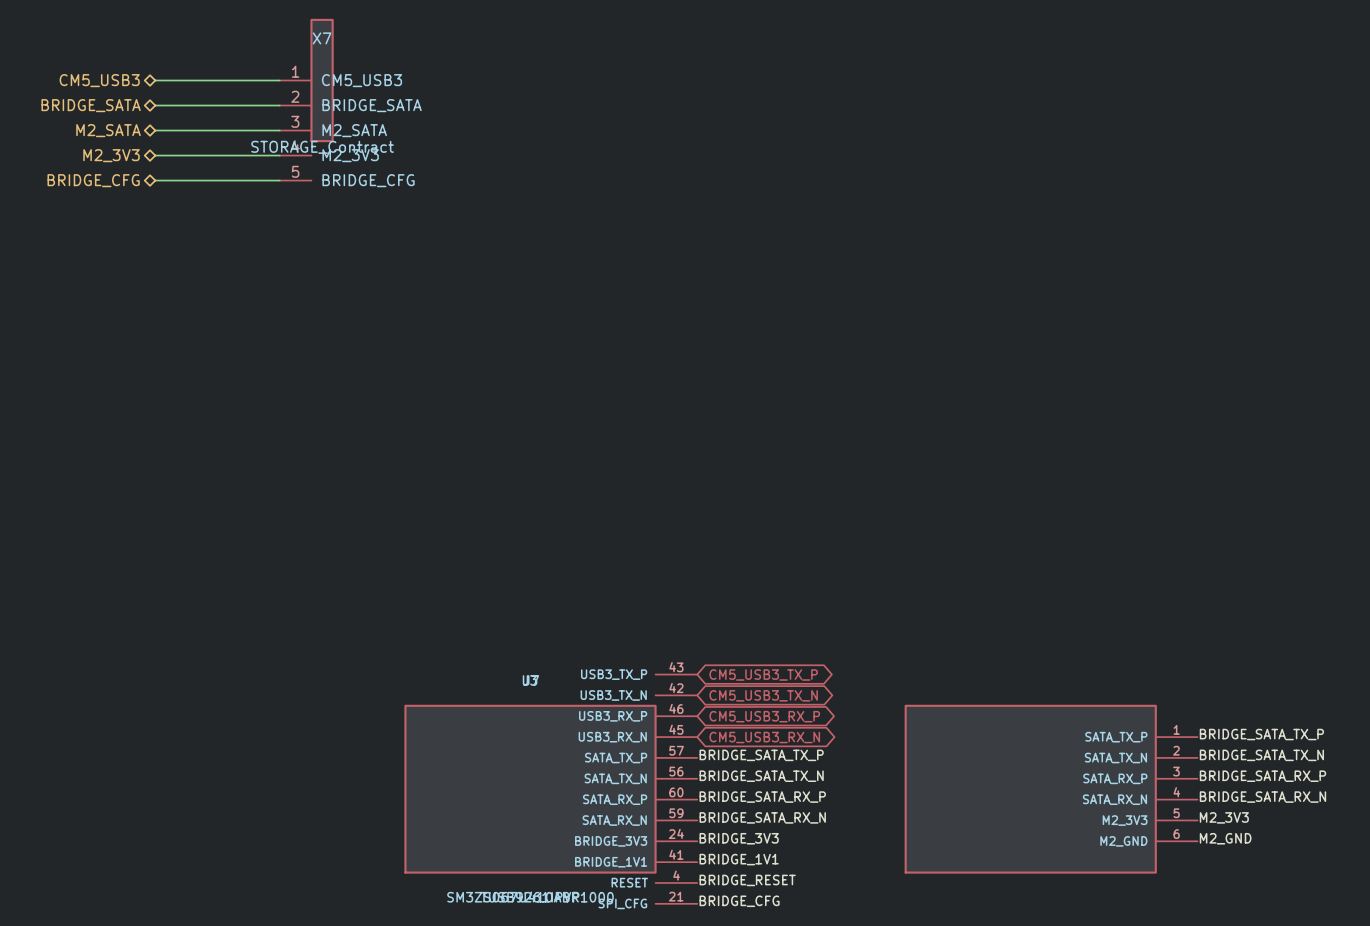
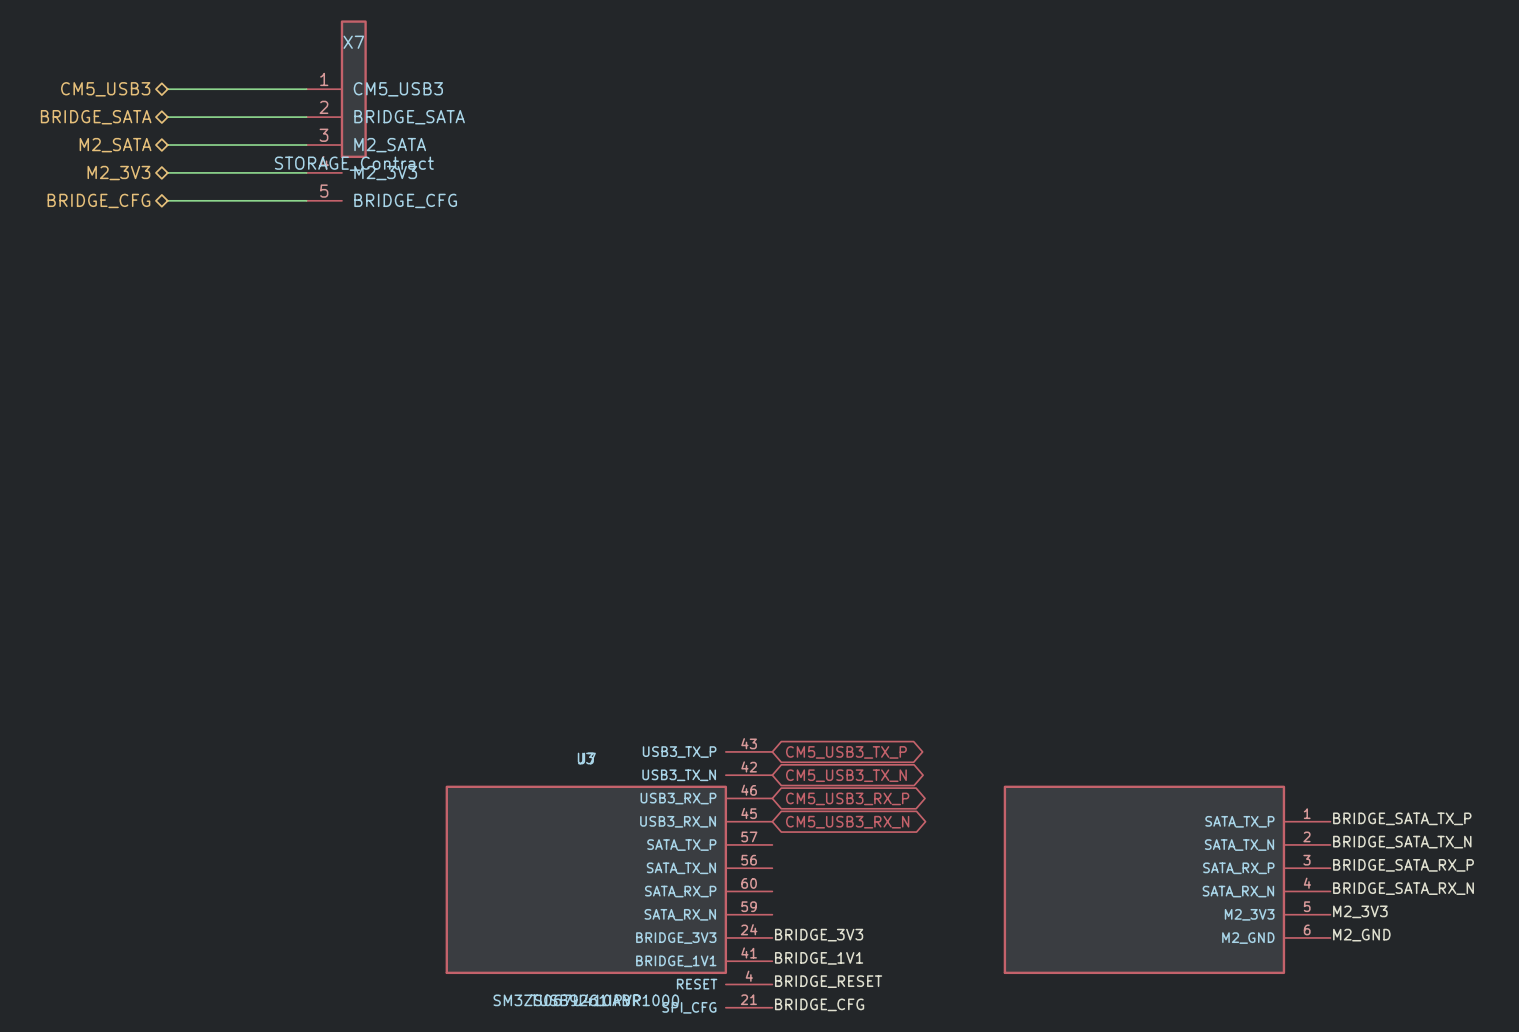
label: BRIDGE_SATA_TX_P (761, 755) -> none
label: BRIDGE_SATA_TX_N (761, 776) -> none
label: BRIDGE_SATA_RX_P (762, 797) -> none
label: BRIDGE_SATA_RX_N (762, 817) -> none

